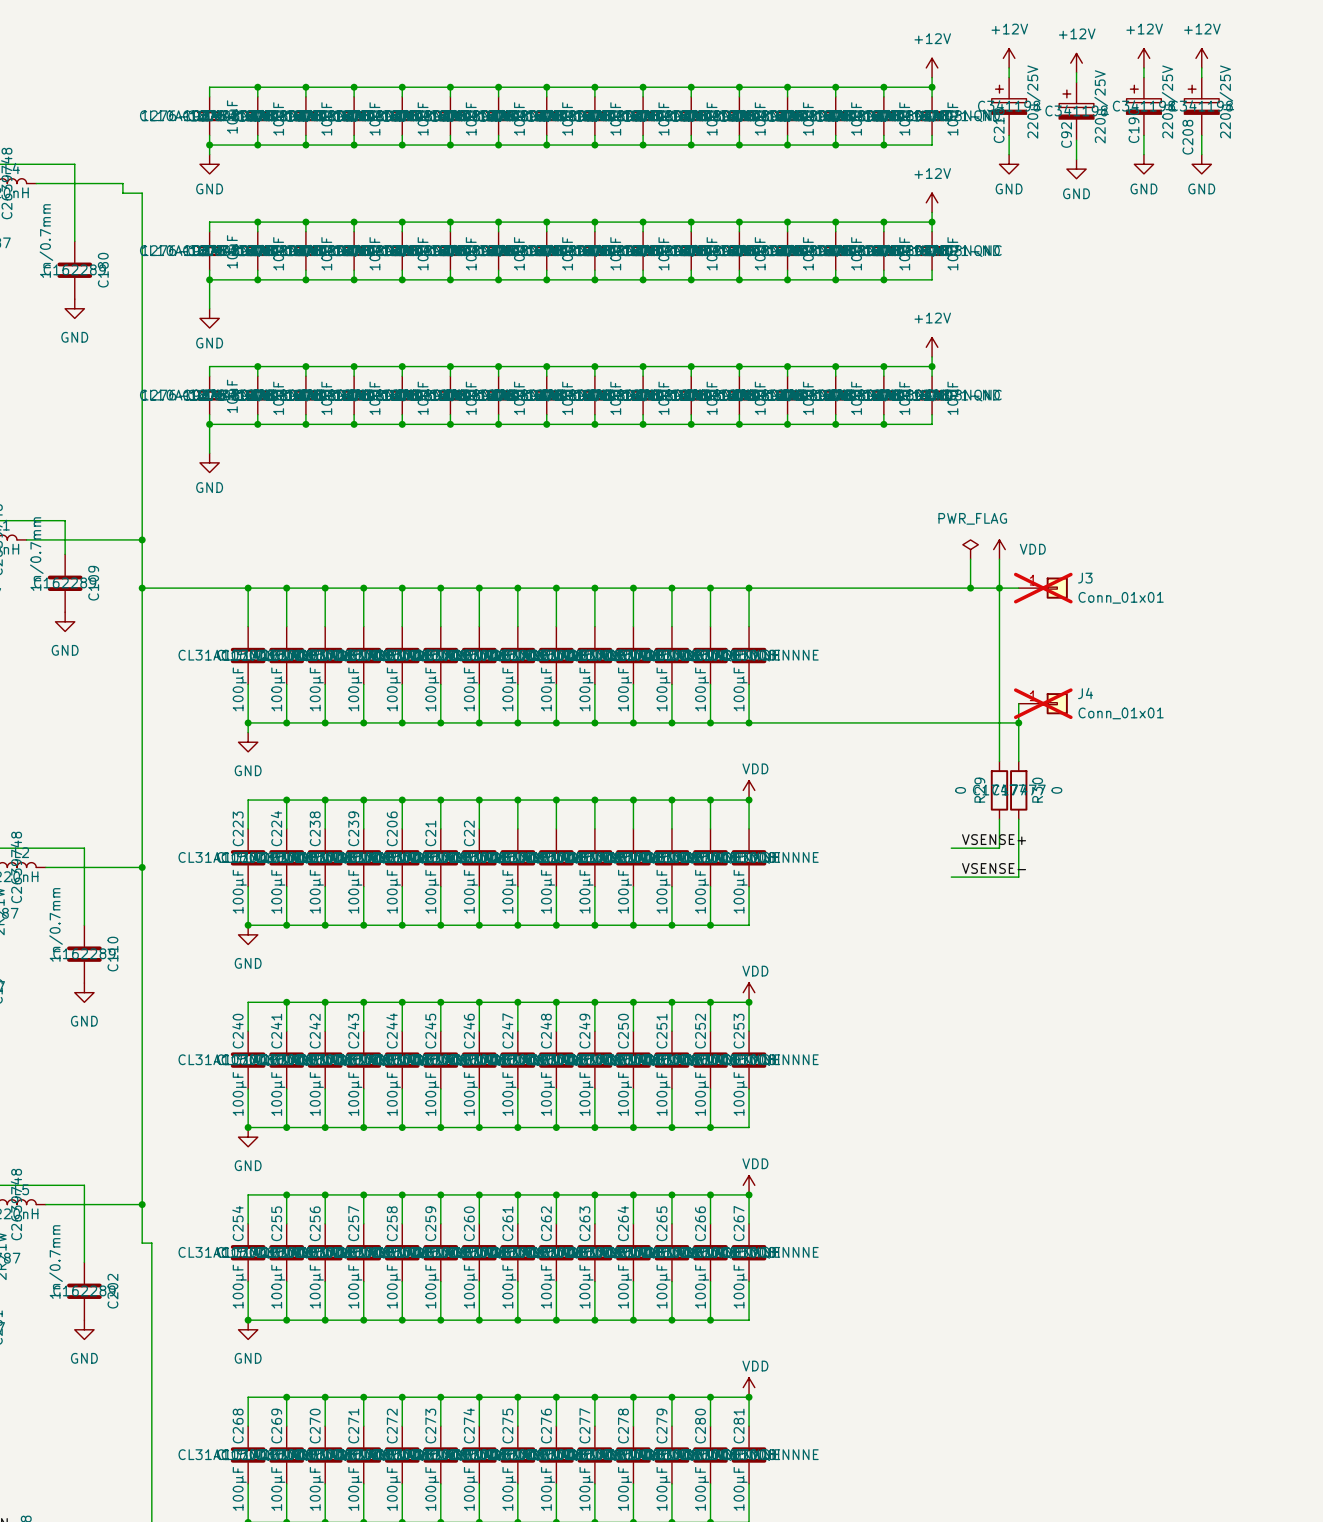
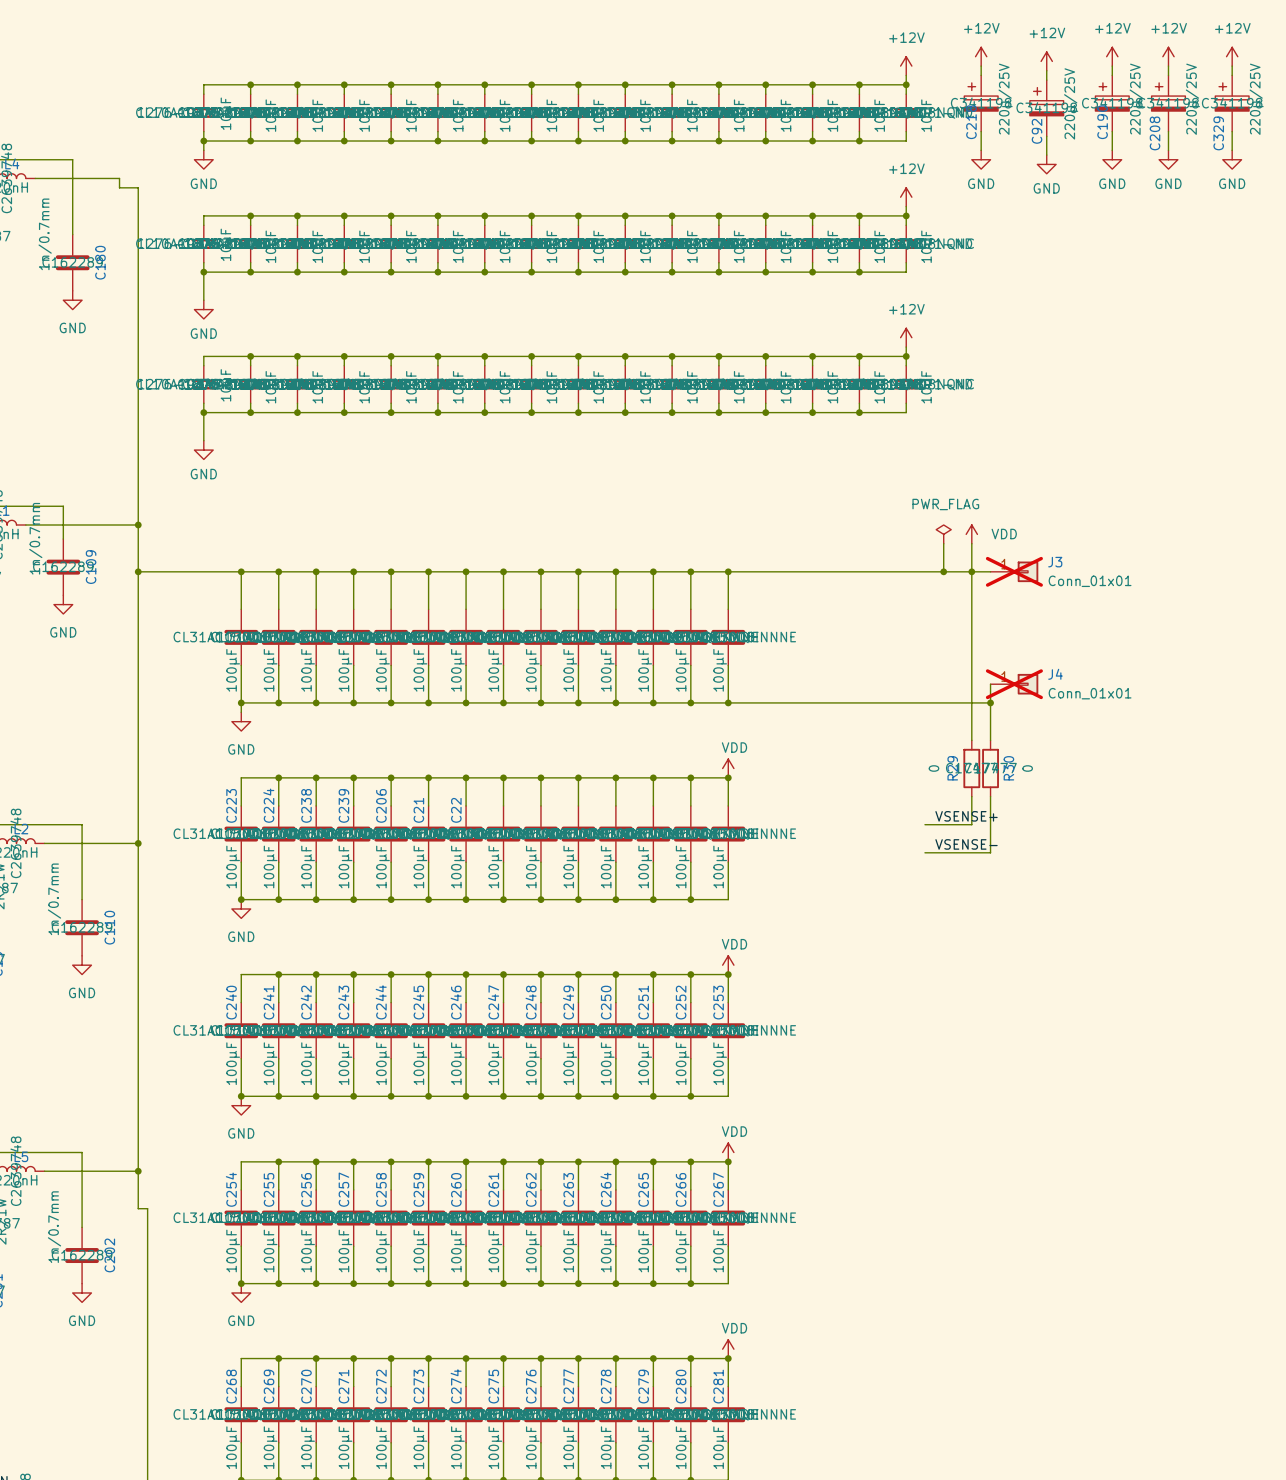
power symbol: none -> +12V (1232, 56)
wire: none -> (1232, 66) (1232, 75)
C329: none -> 220µ/25V (1232, 103)
wire: none -> (1232, 131) (1232, 150)
power symbol: none -> GND (1232, 159)

